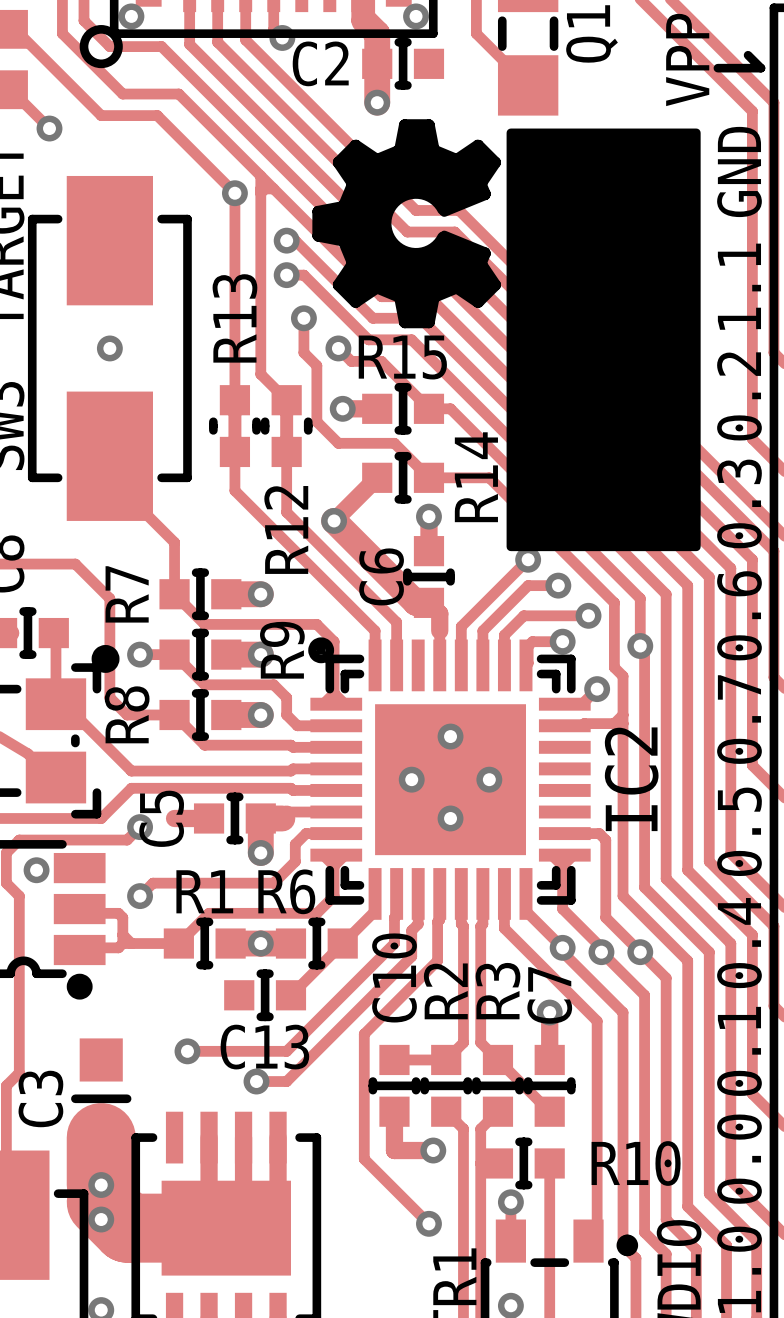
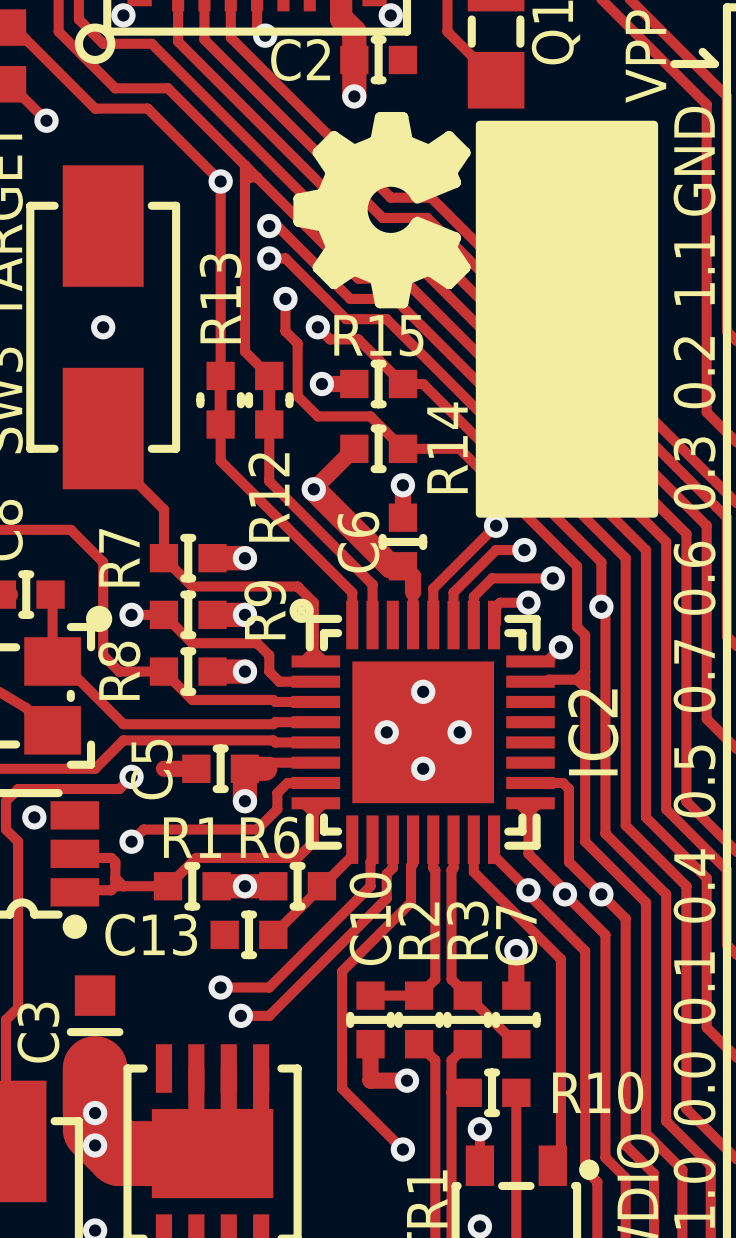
C13 name position: C13 (264, 1047) -> C13 (151, 934)
track: (187, 1051) (234, 1051) -> none
via position: (187, 1051) -> (220, 987)

